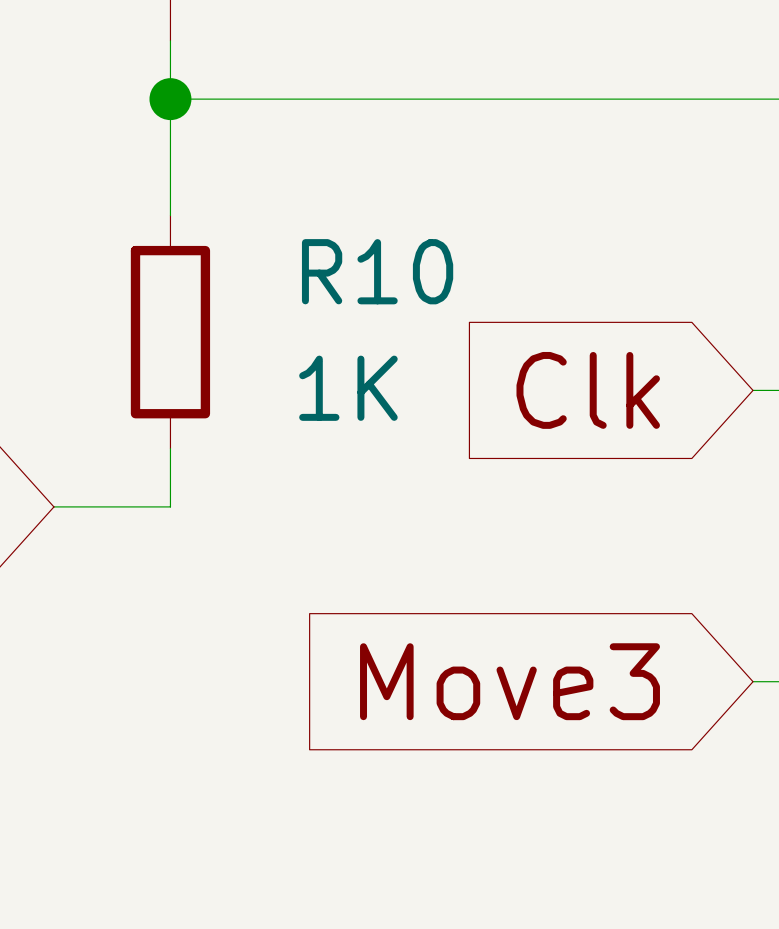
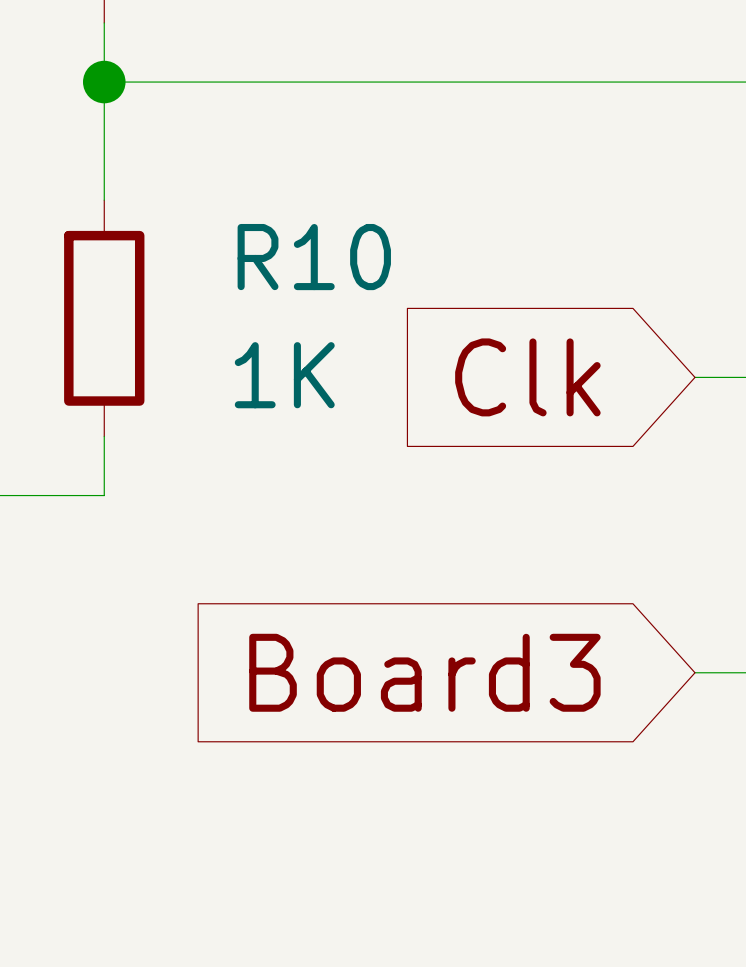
global label: Move3 (509, 681) -> Board3 (424, 672)

